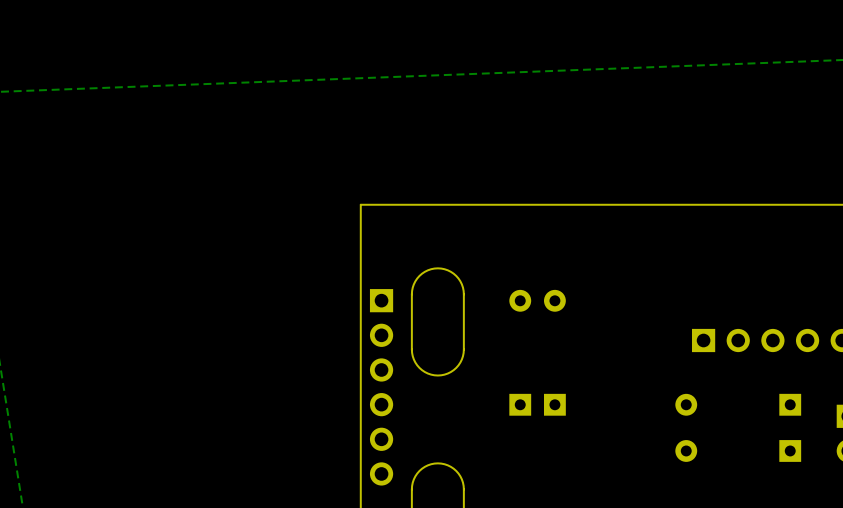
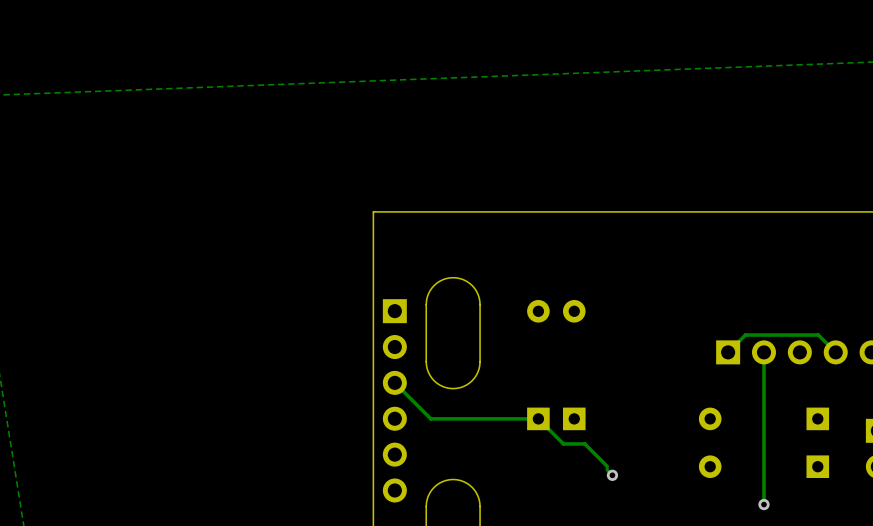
track: none -> (763, 352) (763, 504)
track: none -> (835, 352) (818, 335) (745, 335) (728, 352)
track: none -> (394, 382) (430, 418) (538, 418) (563, 443) (584, 443) (607, 466) (607, 470) (612, 475)
via: none -> (612, 475)
via: none -> (763, 504)

